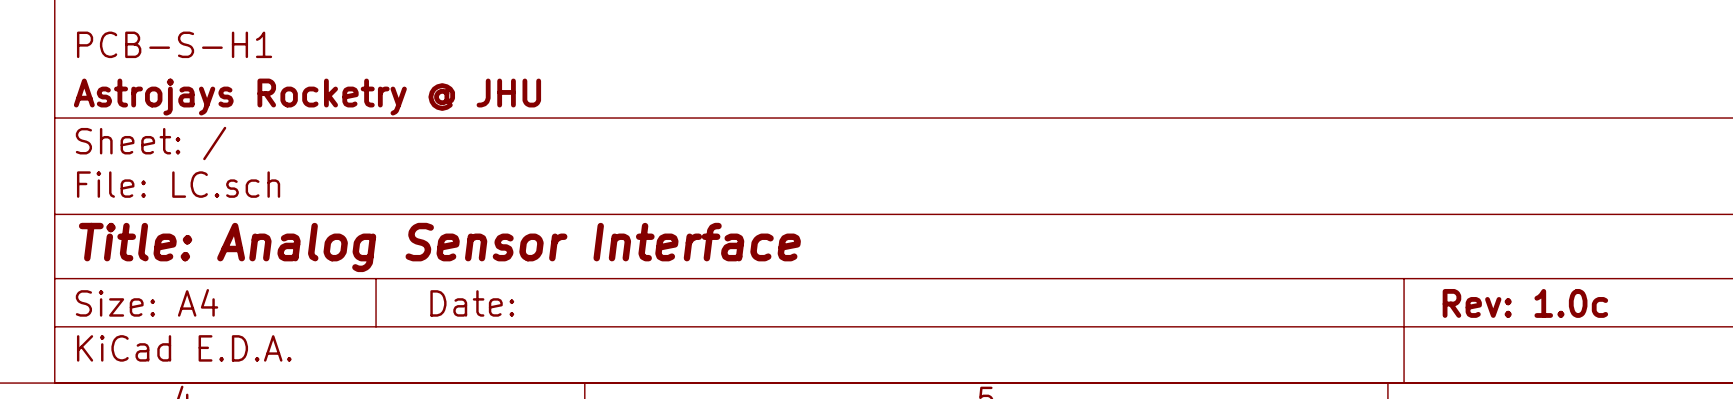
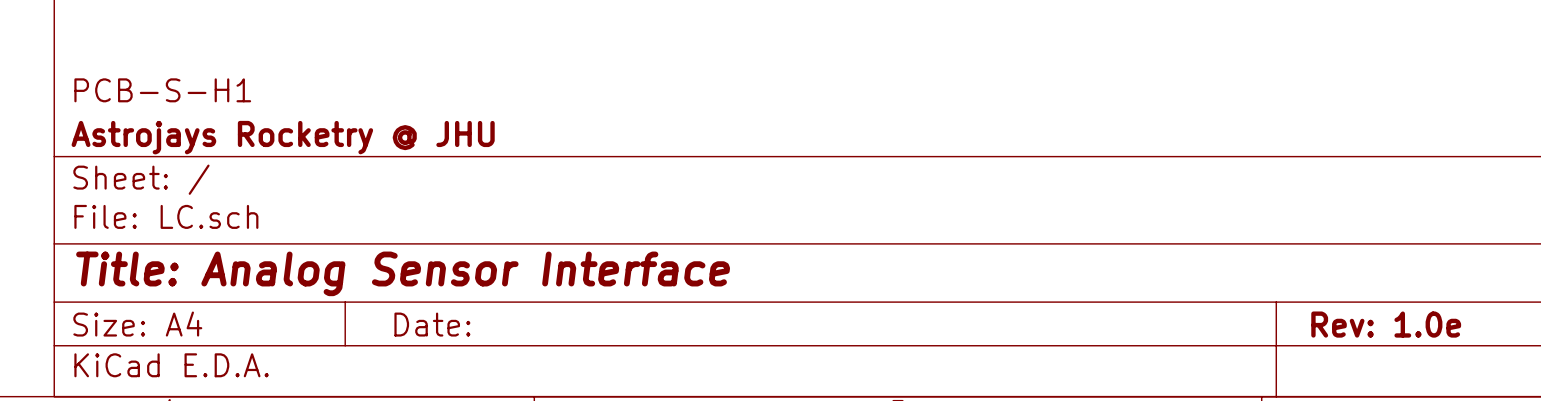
title block: Rev: 1.0c (1525, 303) -> Rev: 1.0e (1386, 324)

